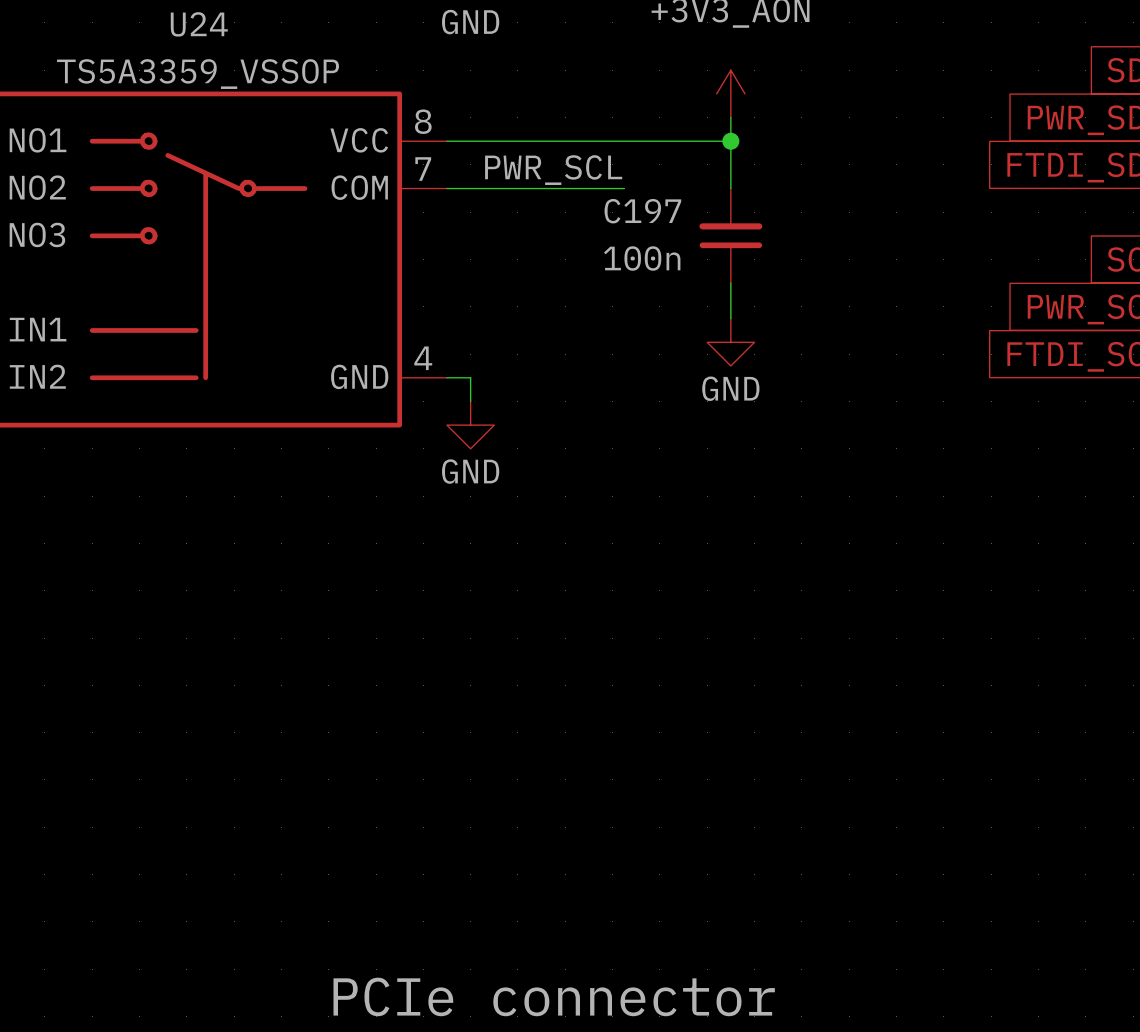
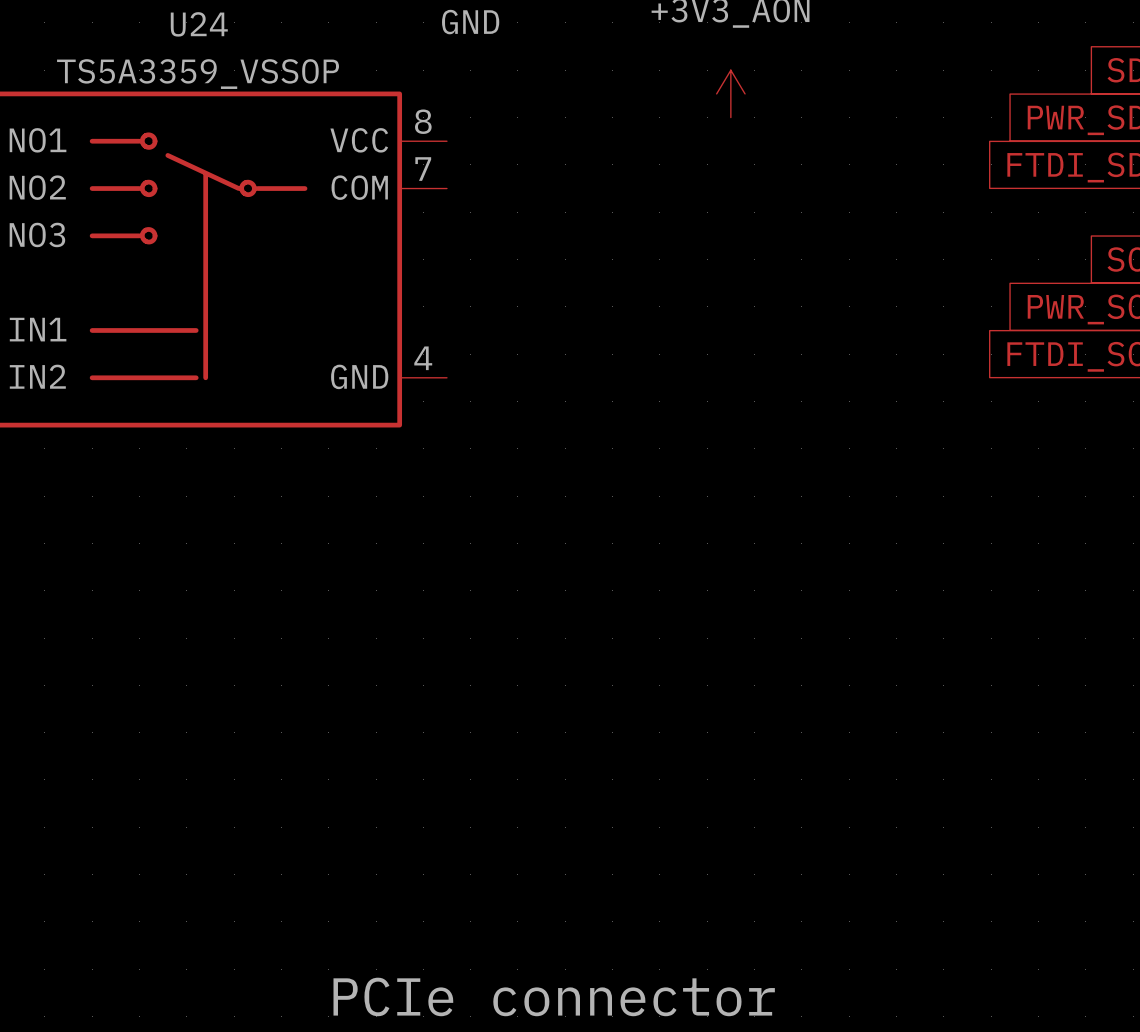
wire: (730, 117) (730, 188) -> none
wire: (446, 141) (730, 141) -> none
junction: (730, 141) -> none
label: PWR_SCL (553, 170) -> none
wire: (446, 188) (624, 188) -> none
C197: (730, 235) -> none
wire: (730, 283) (730, 318) -> none
power symbol: GND (730, 342) -> none
wire: (446, 377) (470, 377) (470, 401) -> none
power symbol: GND (470, 425) -> none

